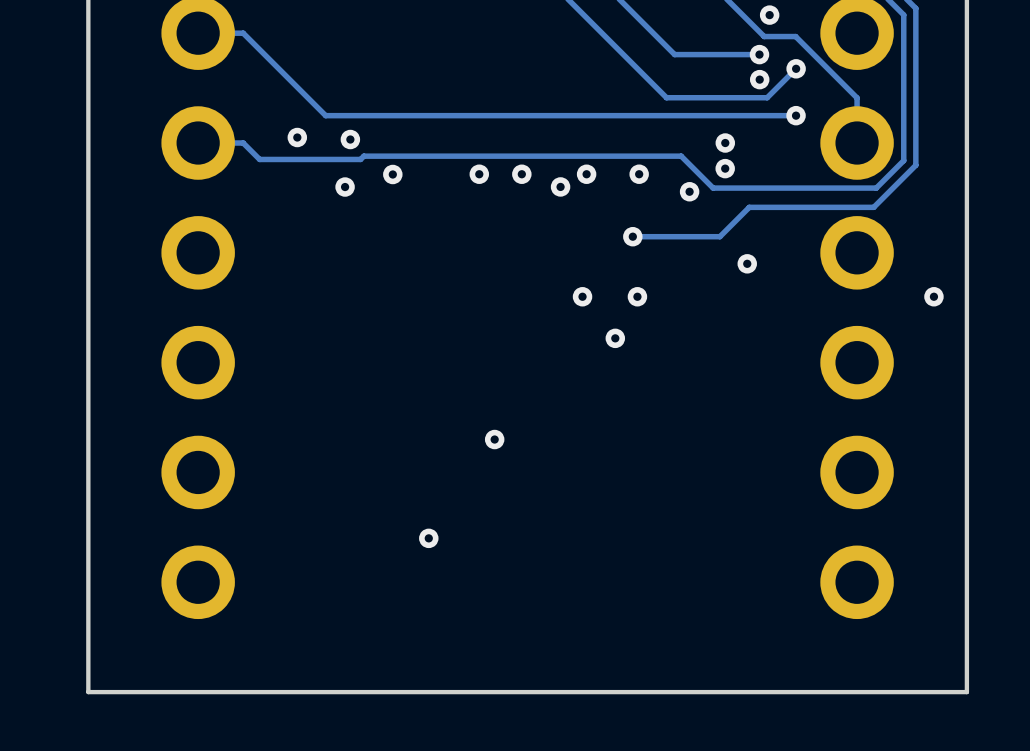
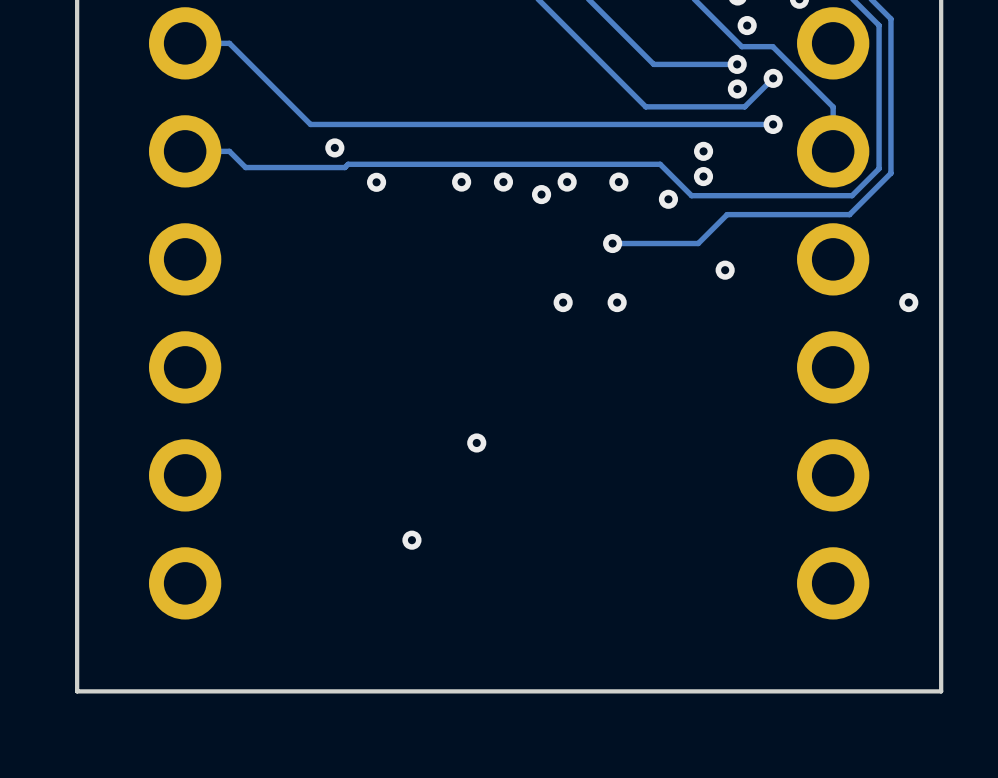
via: (297, 137) -> none
via: (345, 187) -> none
via: (615, 338) -> none

